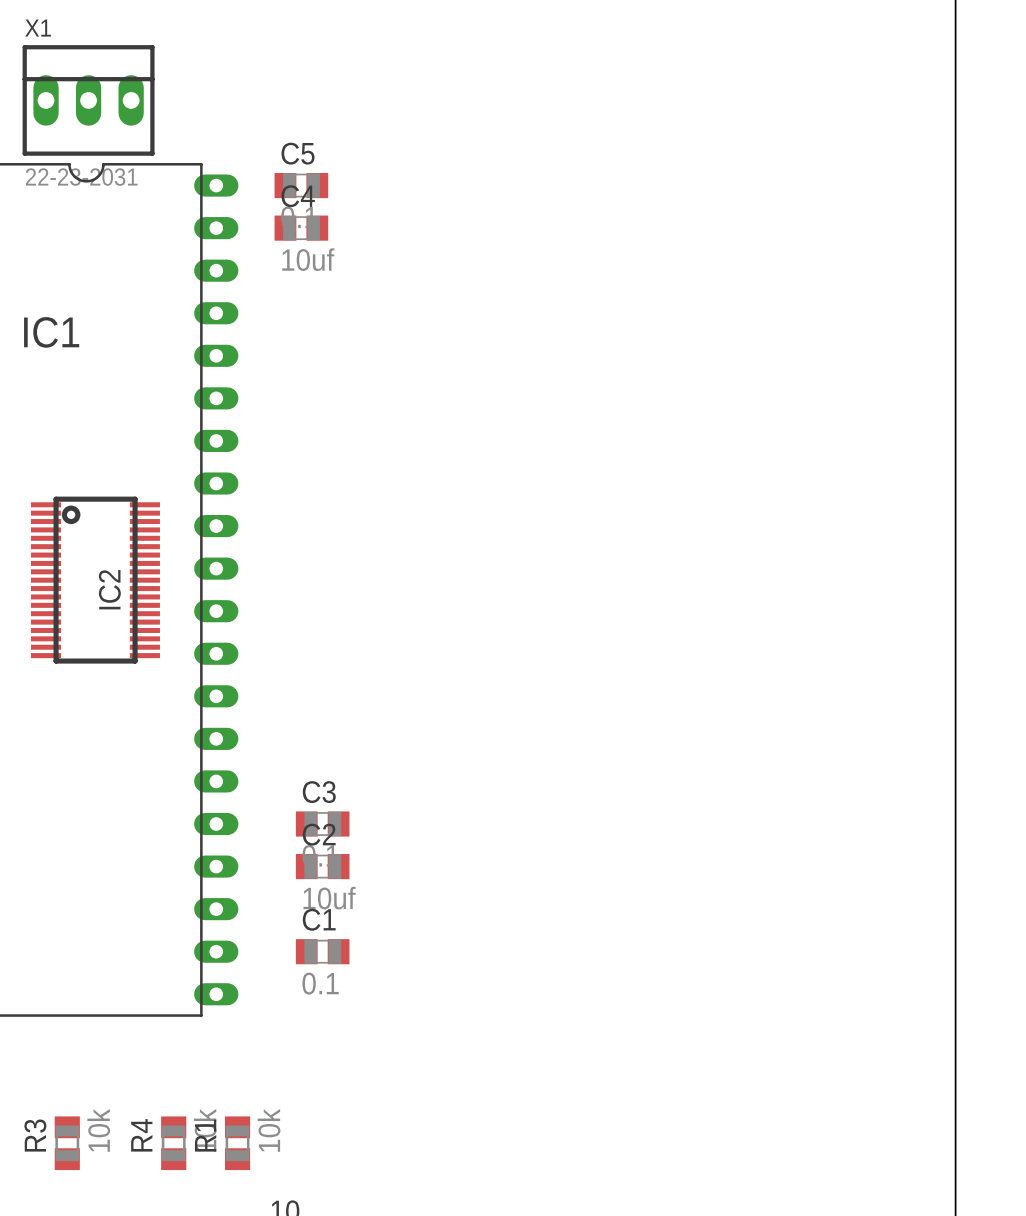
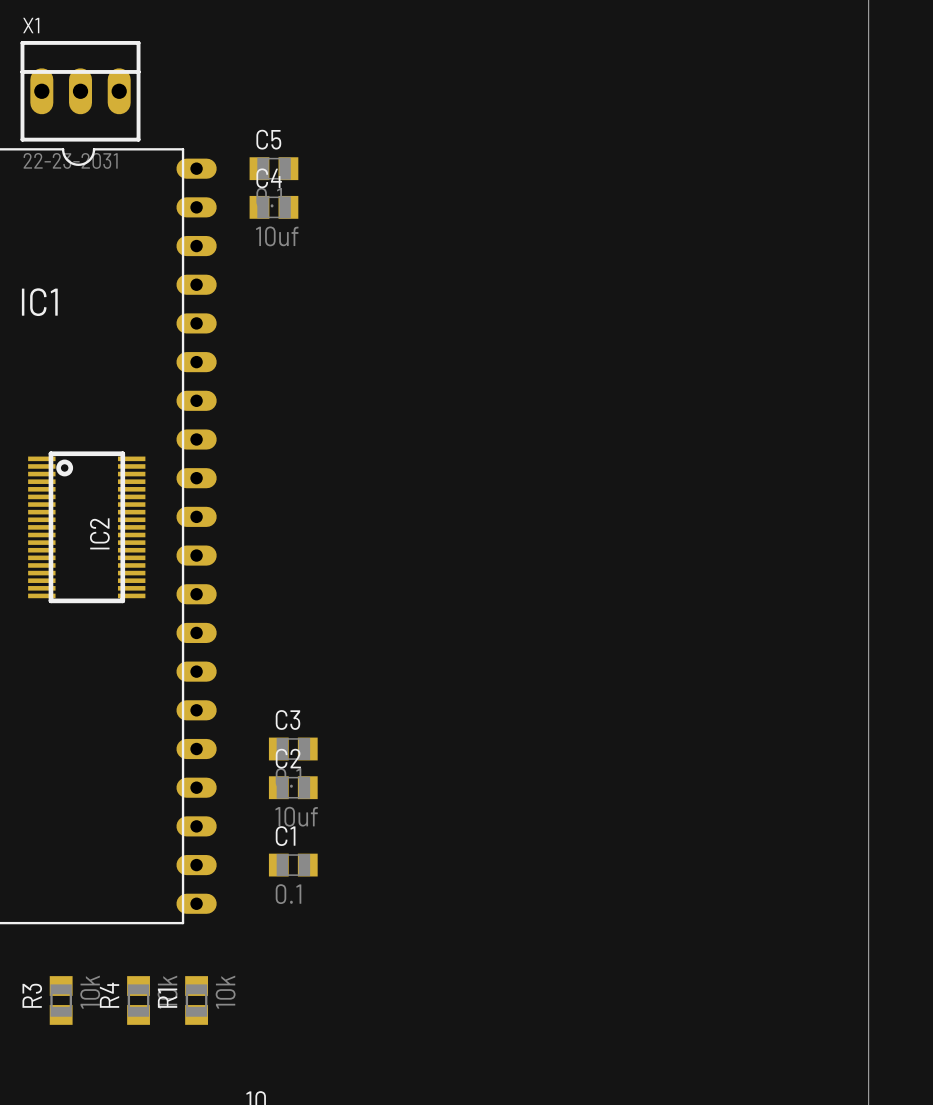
R3 position: (67, 1143) -> (61, 1000)
R4 position: (173, 1143) -> (138, 1000)
R1 position: (237, 1143) -> (196, 1000)

